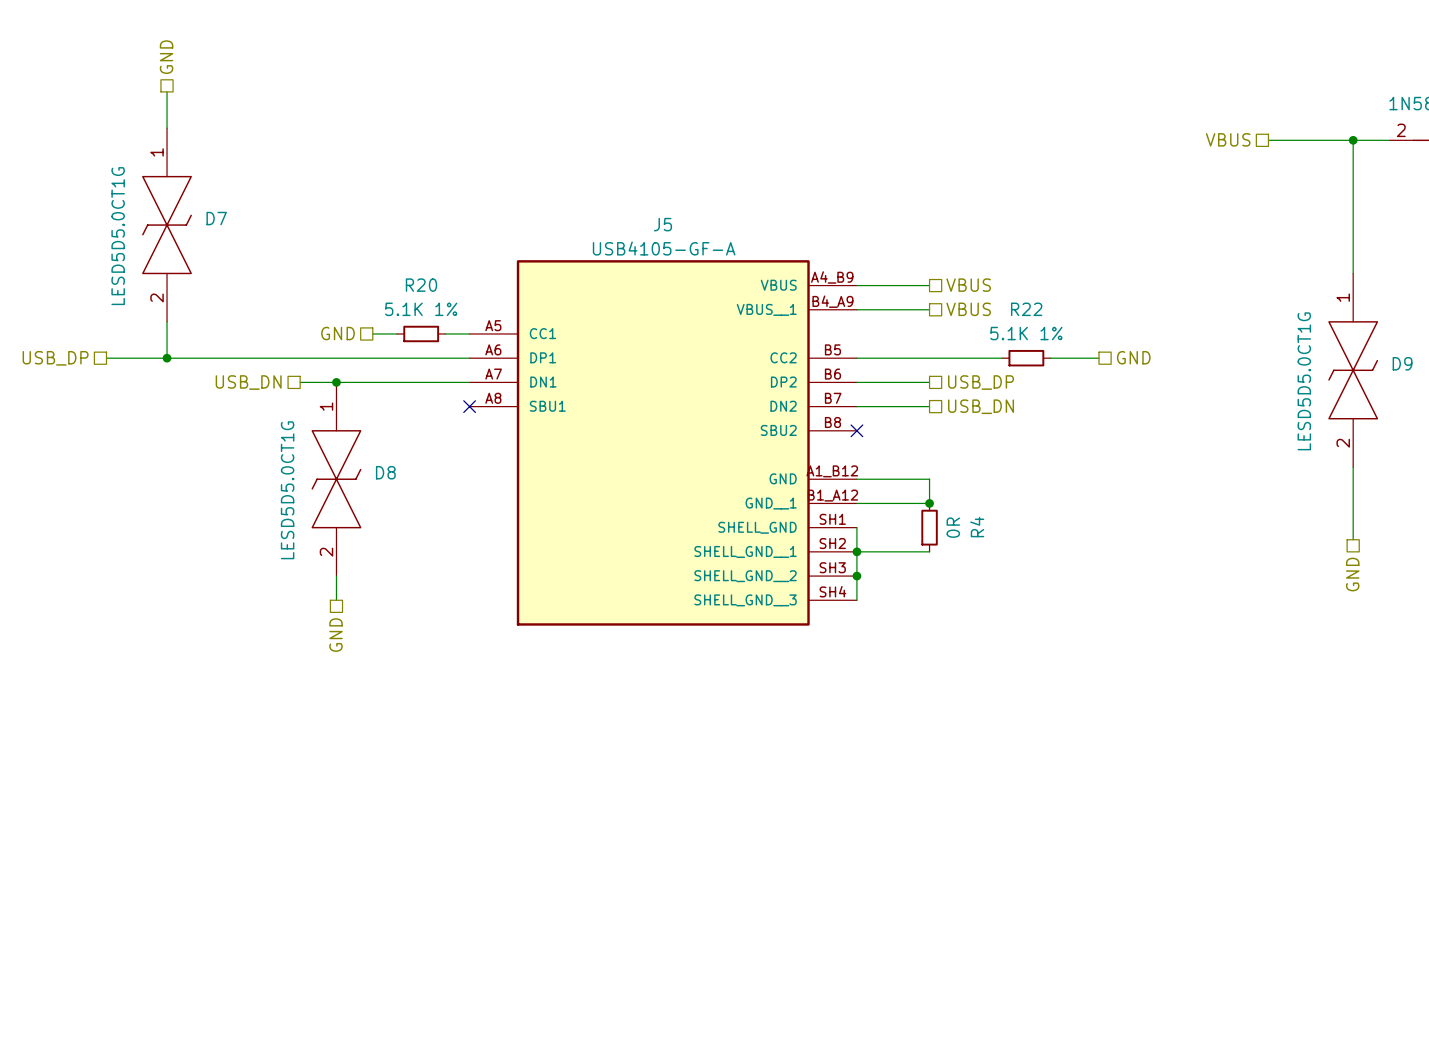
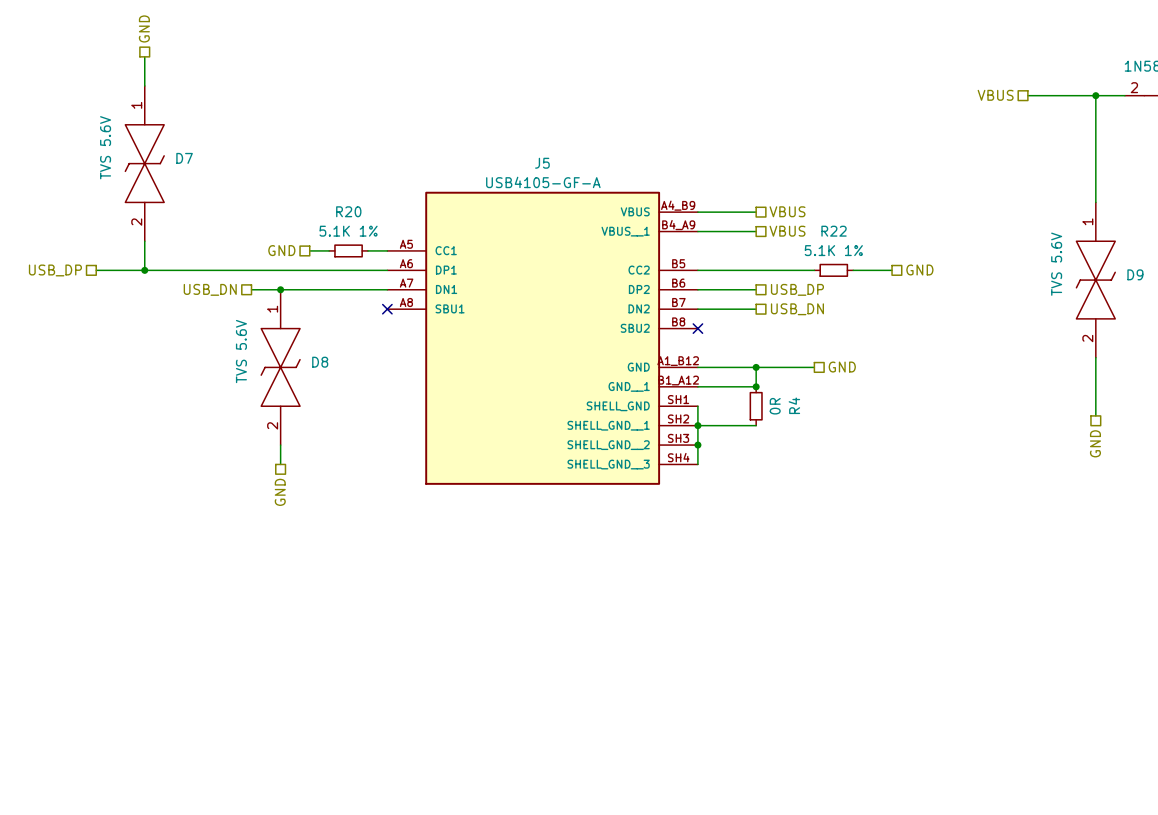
D7 value: LESD5D5.0CT1G (118, 236) -> TVS 5.6V (105, 147)
D9 value: LESD5D5.0CT1G (1304, 381) -> TVS 5.6V (1056, 264)
hierarchical label: none -> GND (842, 367)
wire: none -> (756, 367) (814, 367)
junction: none -> (756, 367)
D8 value: LESD5D5.0CT1G (287, 490) -> TVS 5.6V (241, 351)

